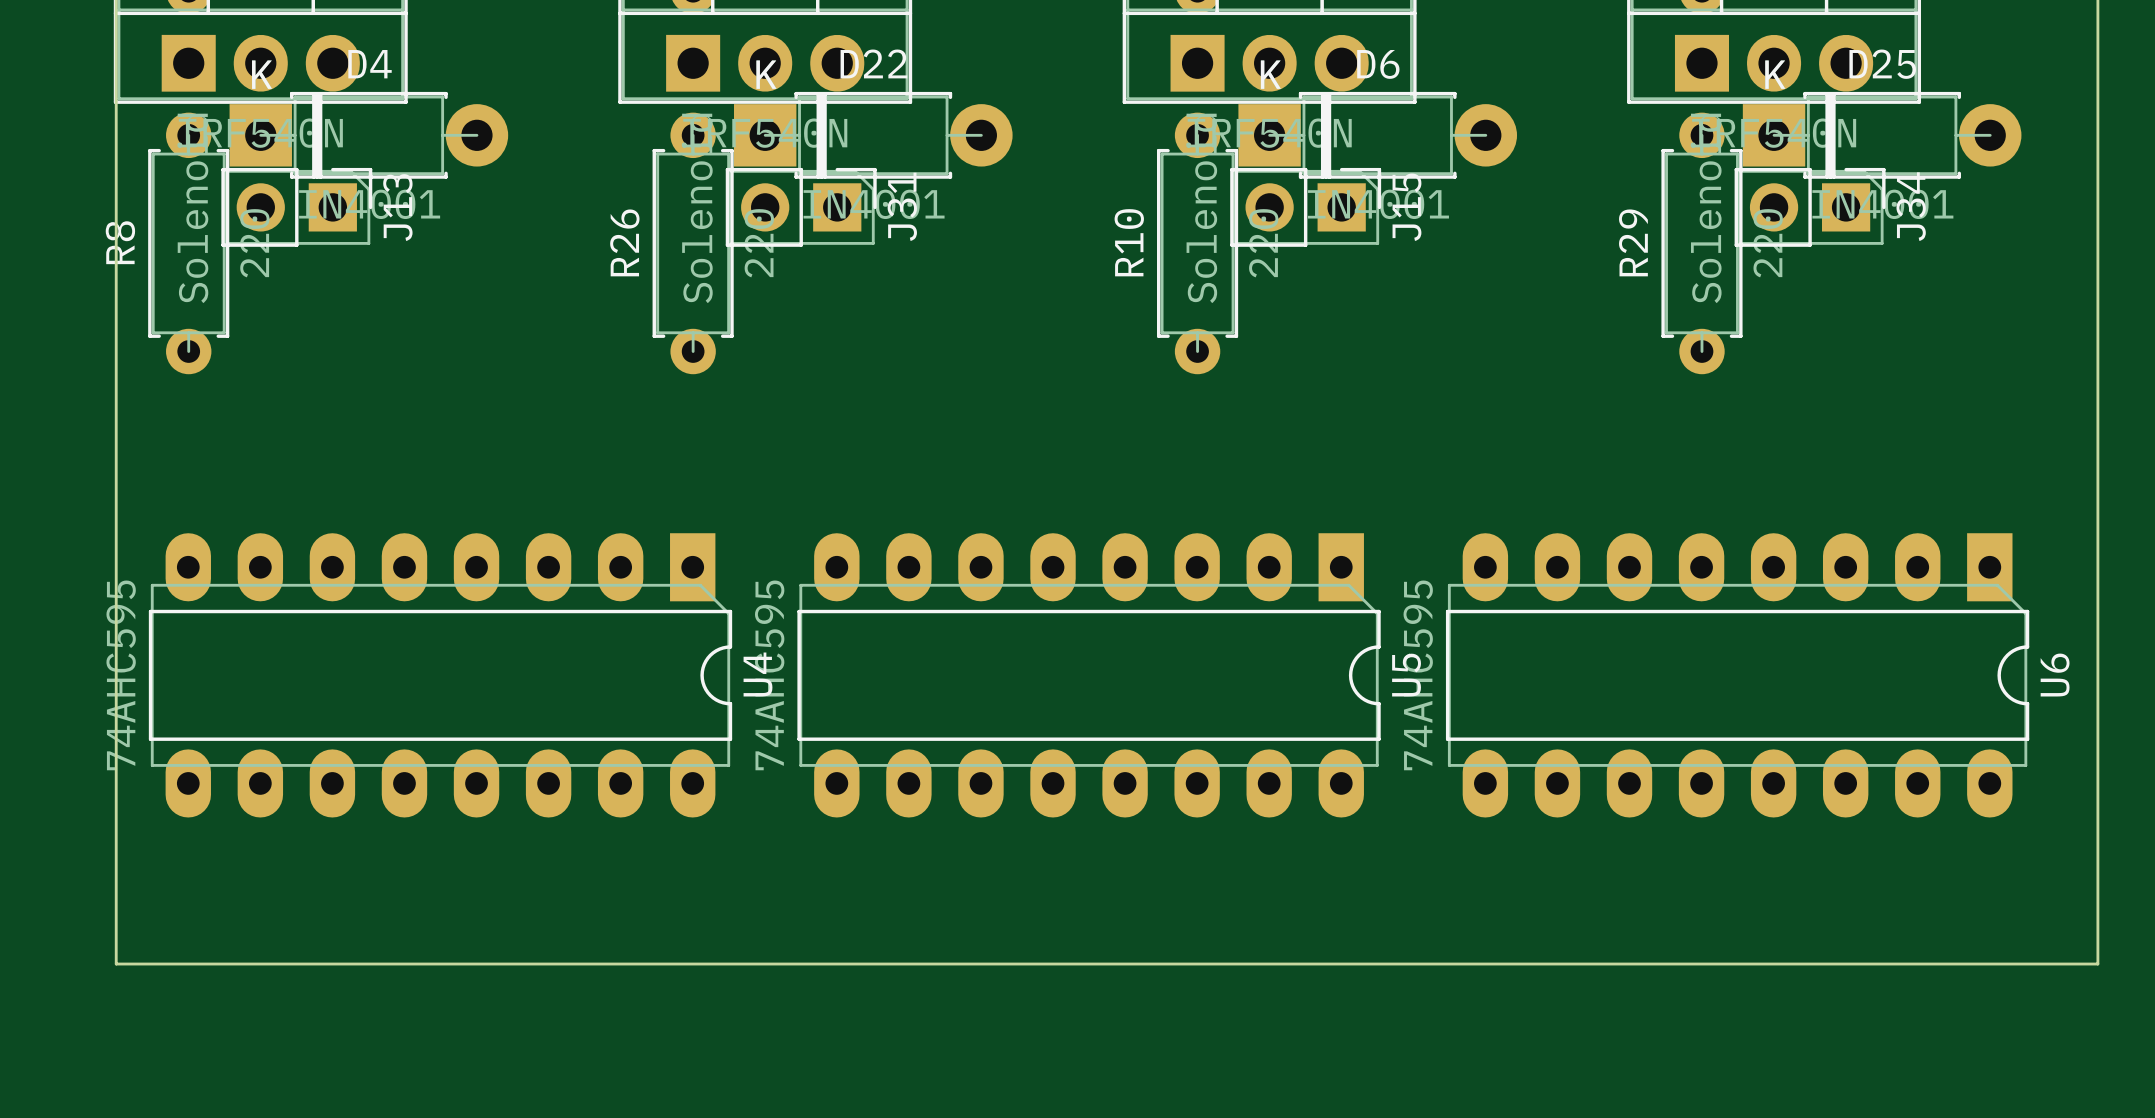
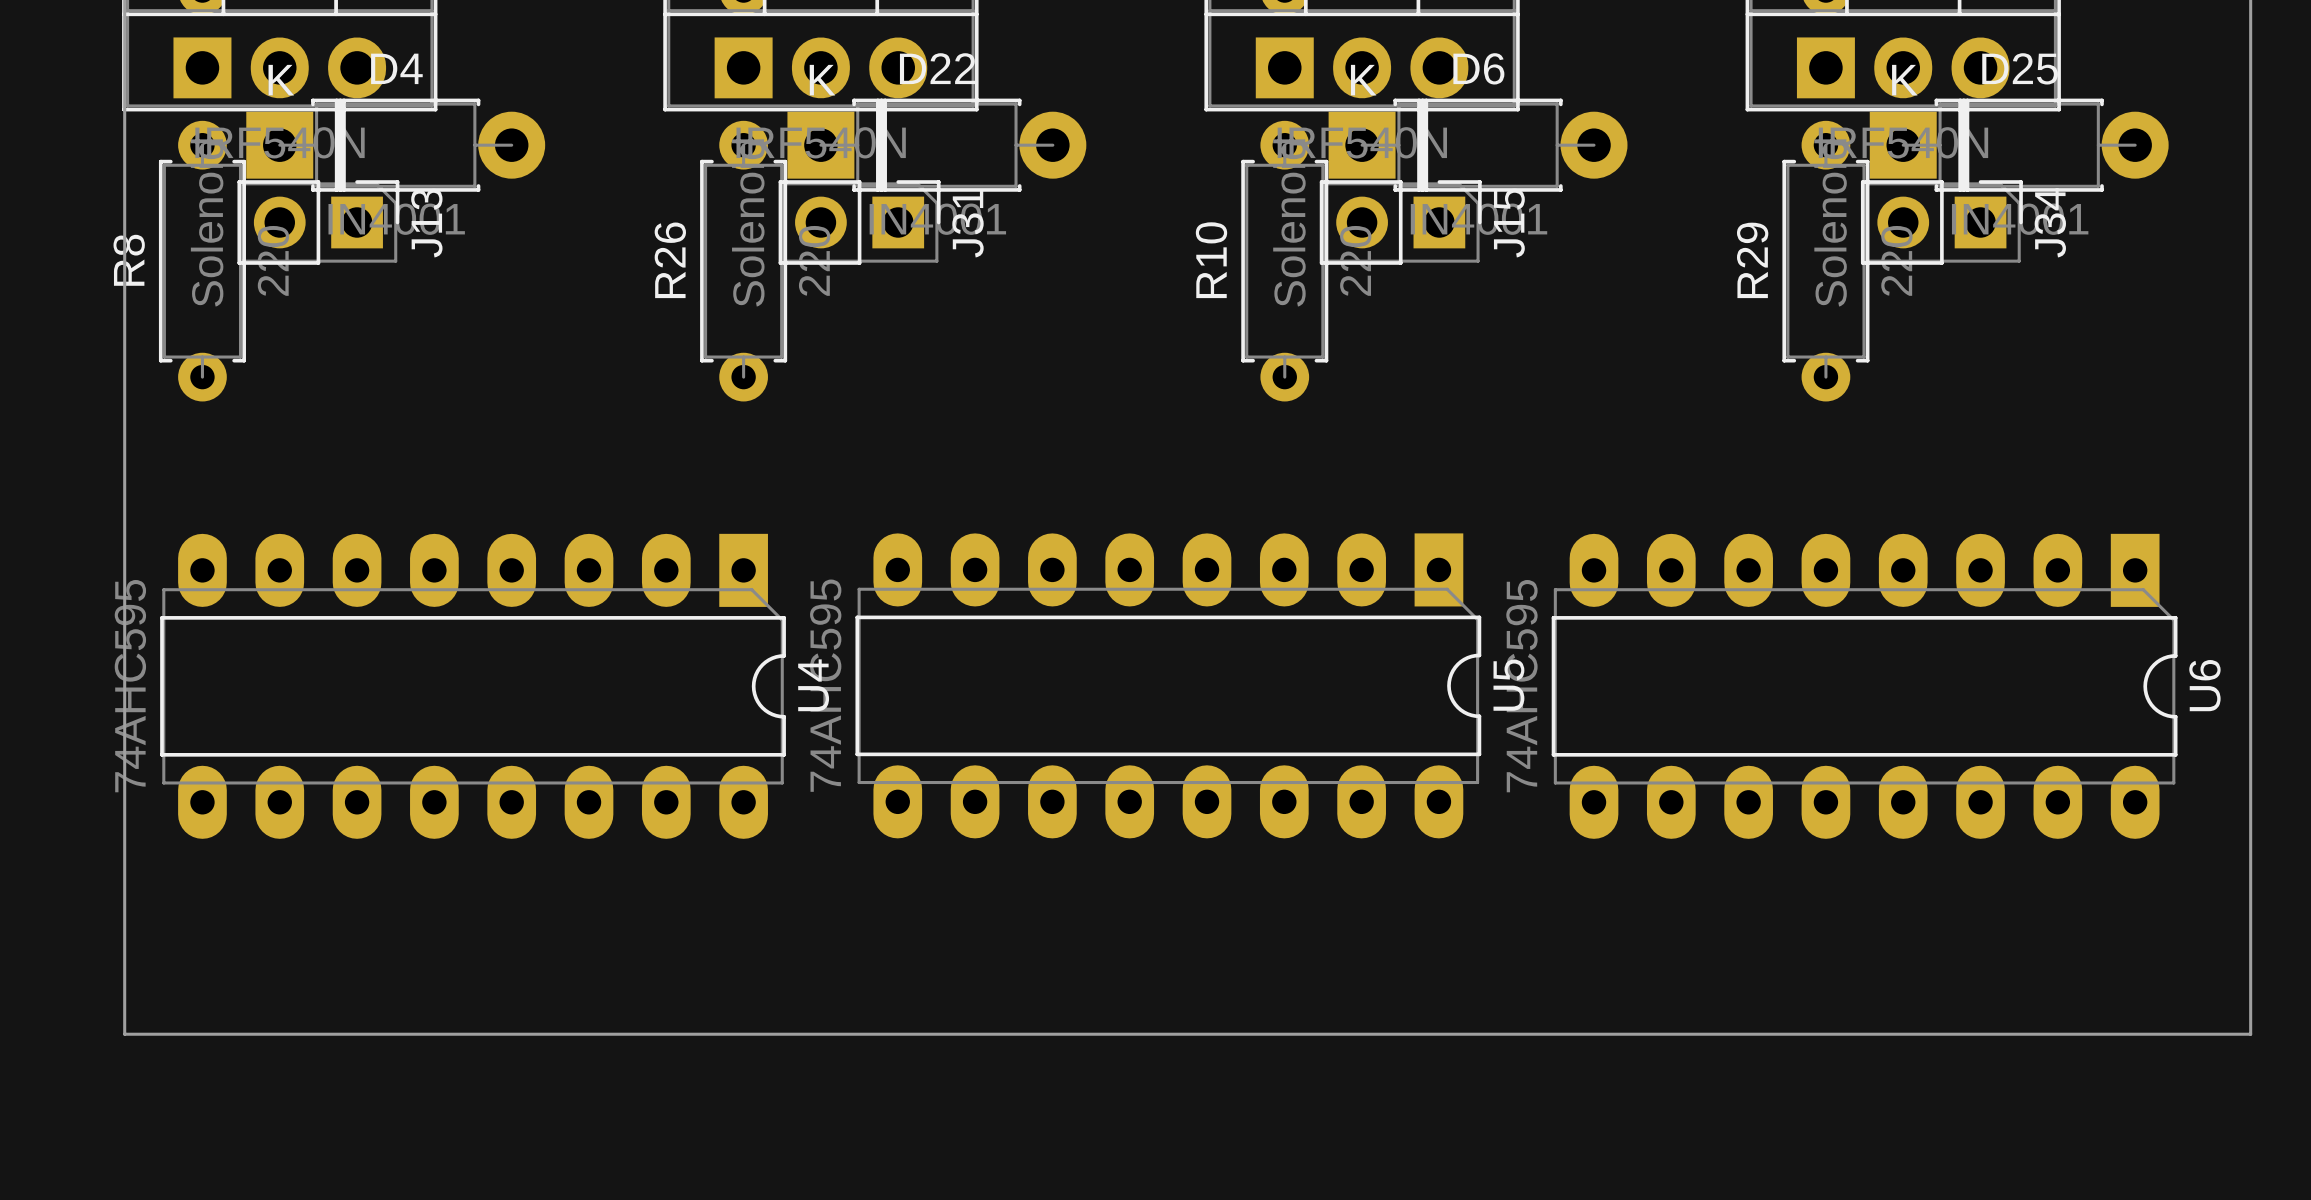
U4 position: (440, 675) -> (473, 686)
U5 position: (1089, 675) -> (1168, 685)
U6 position: (1737, 675) -> (1864, 686)

